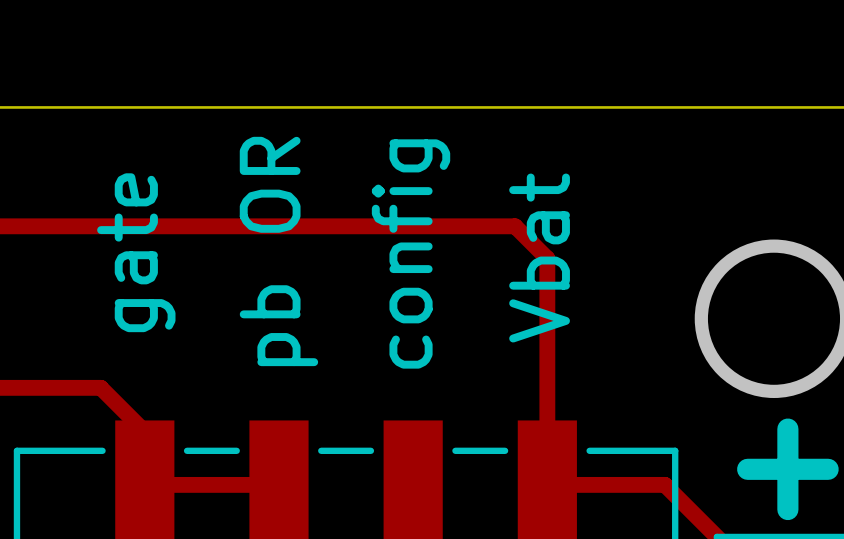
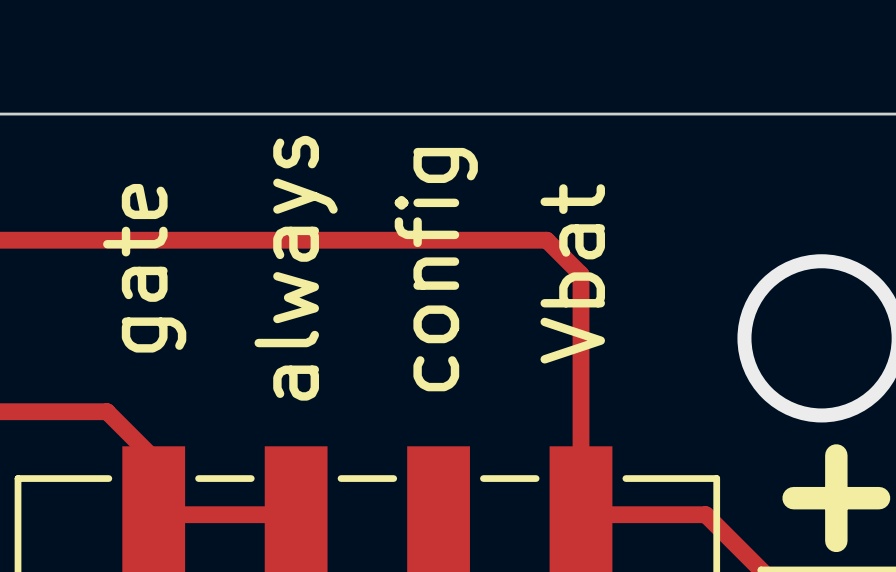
text: pb OR (278, 251) -> always (296, 268)

